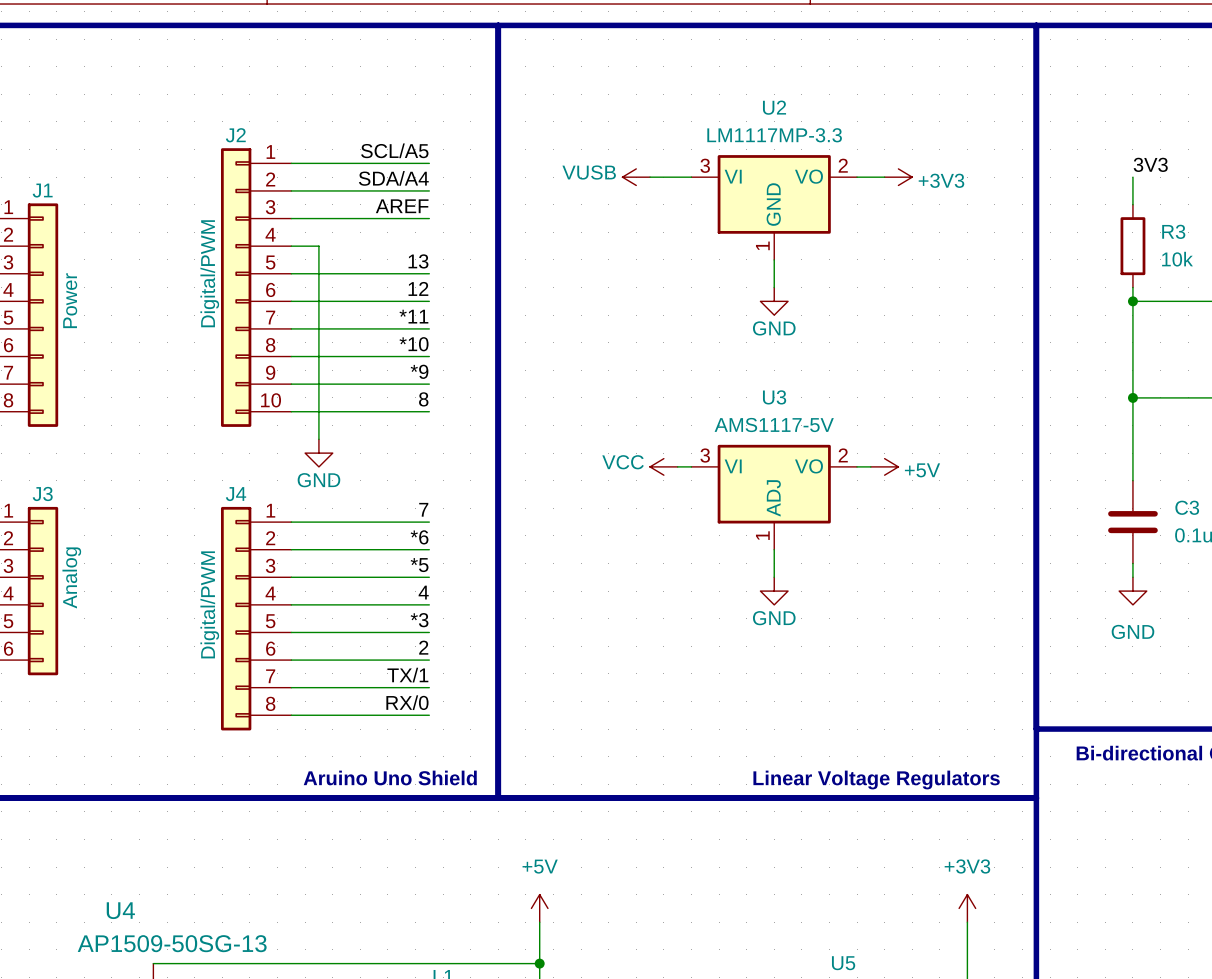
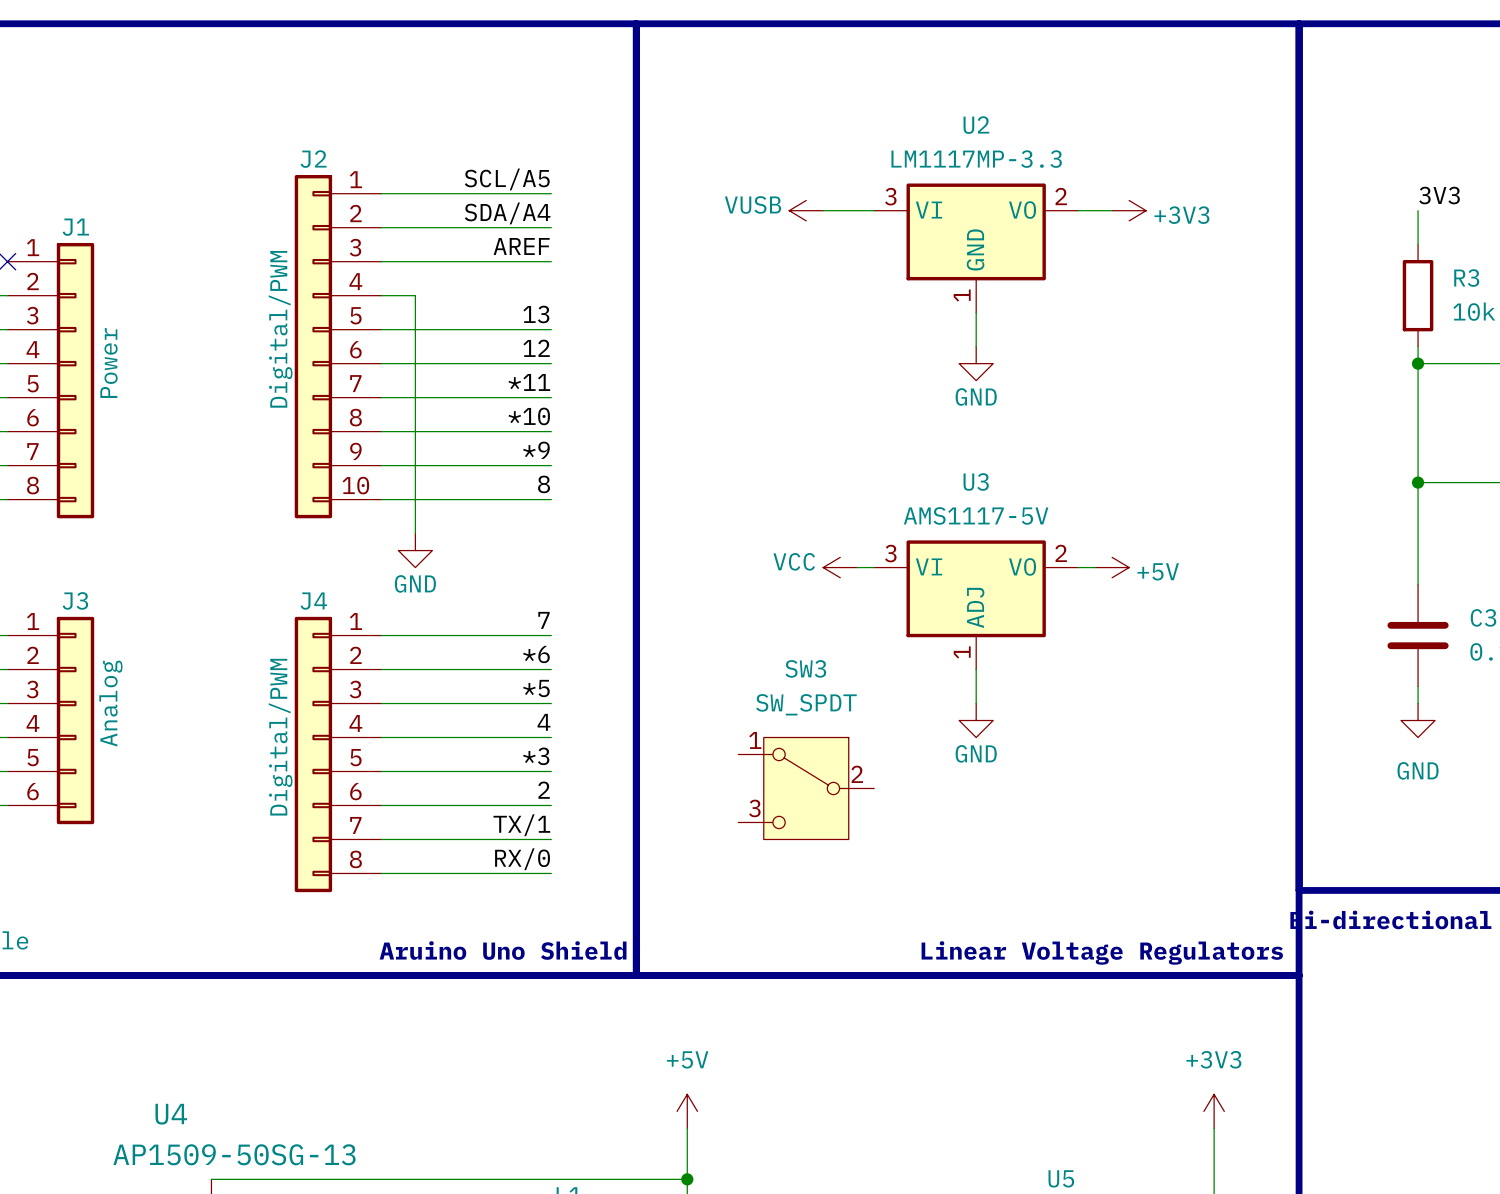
SW3: none -> SW_SPDT (806, 788)

